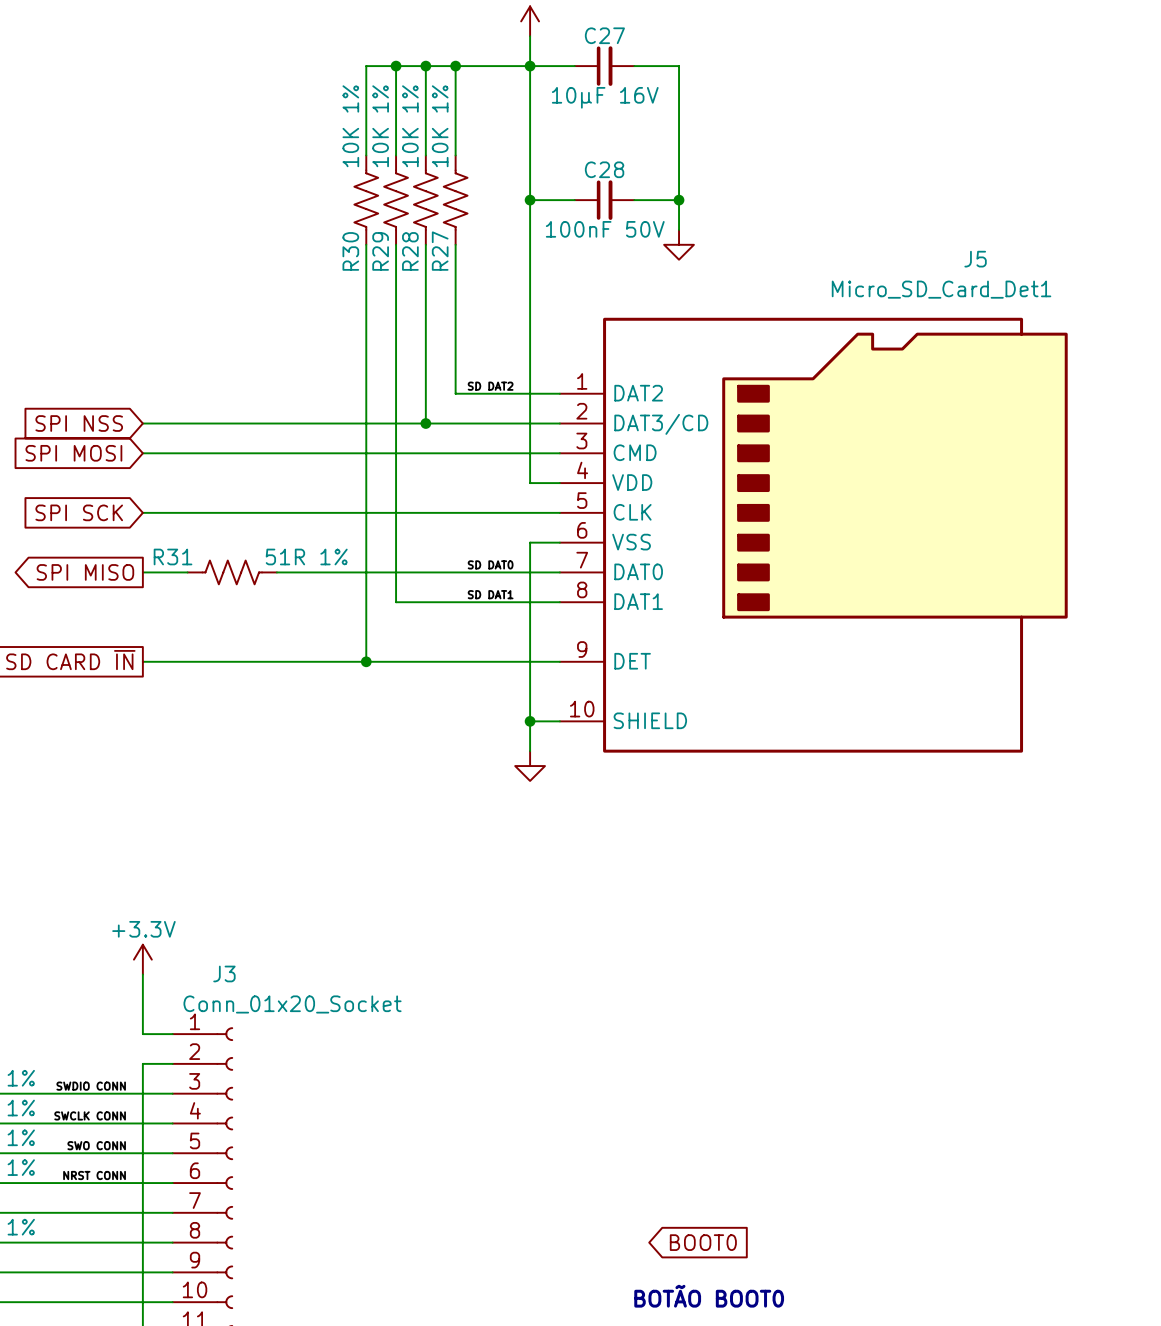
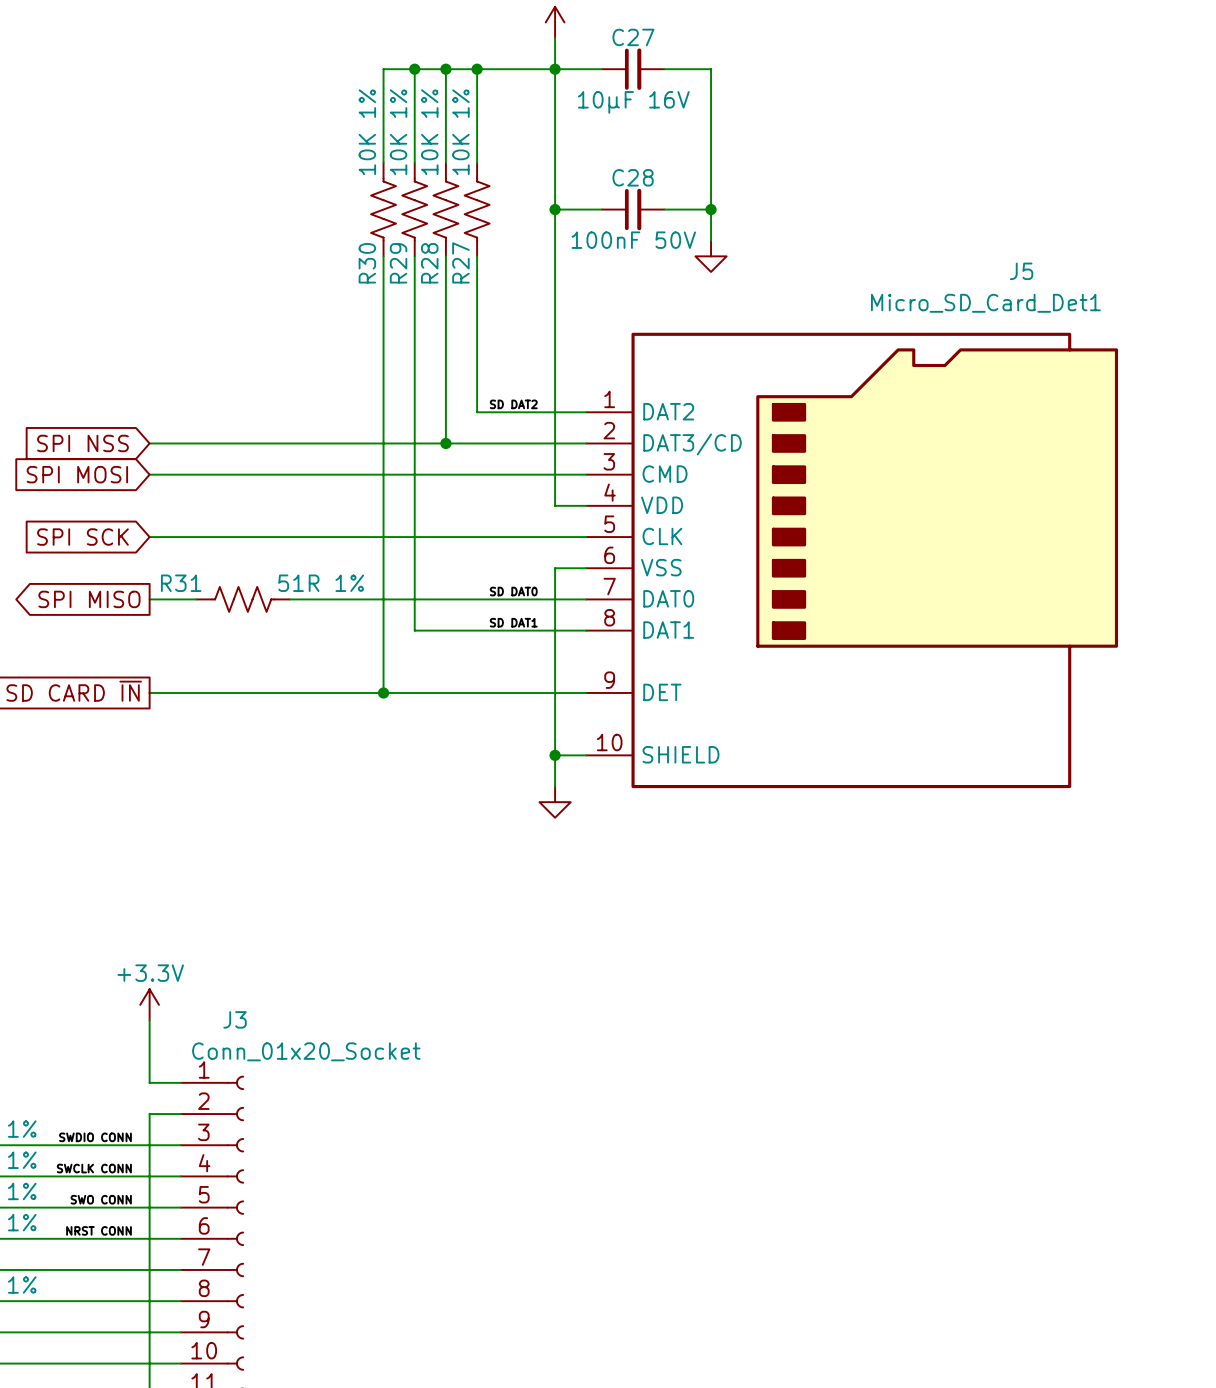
global label: BOOT0 (703, 1242) -> none
text: BOTÃO BOOT0 (709, 1296) -> none

